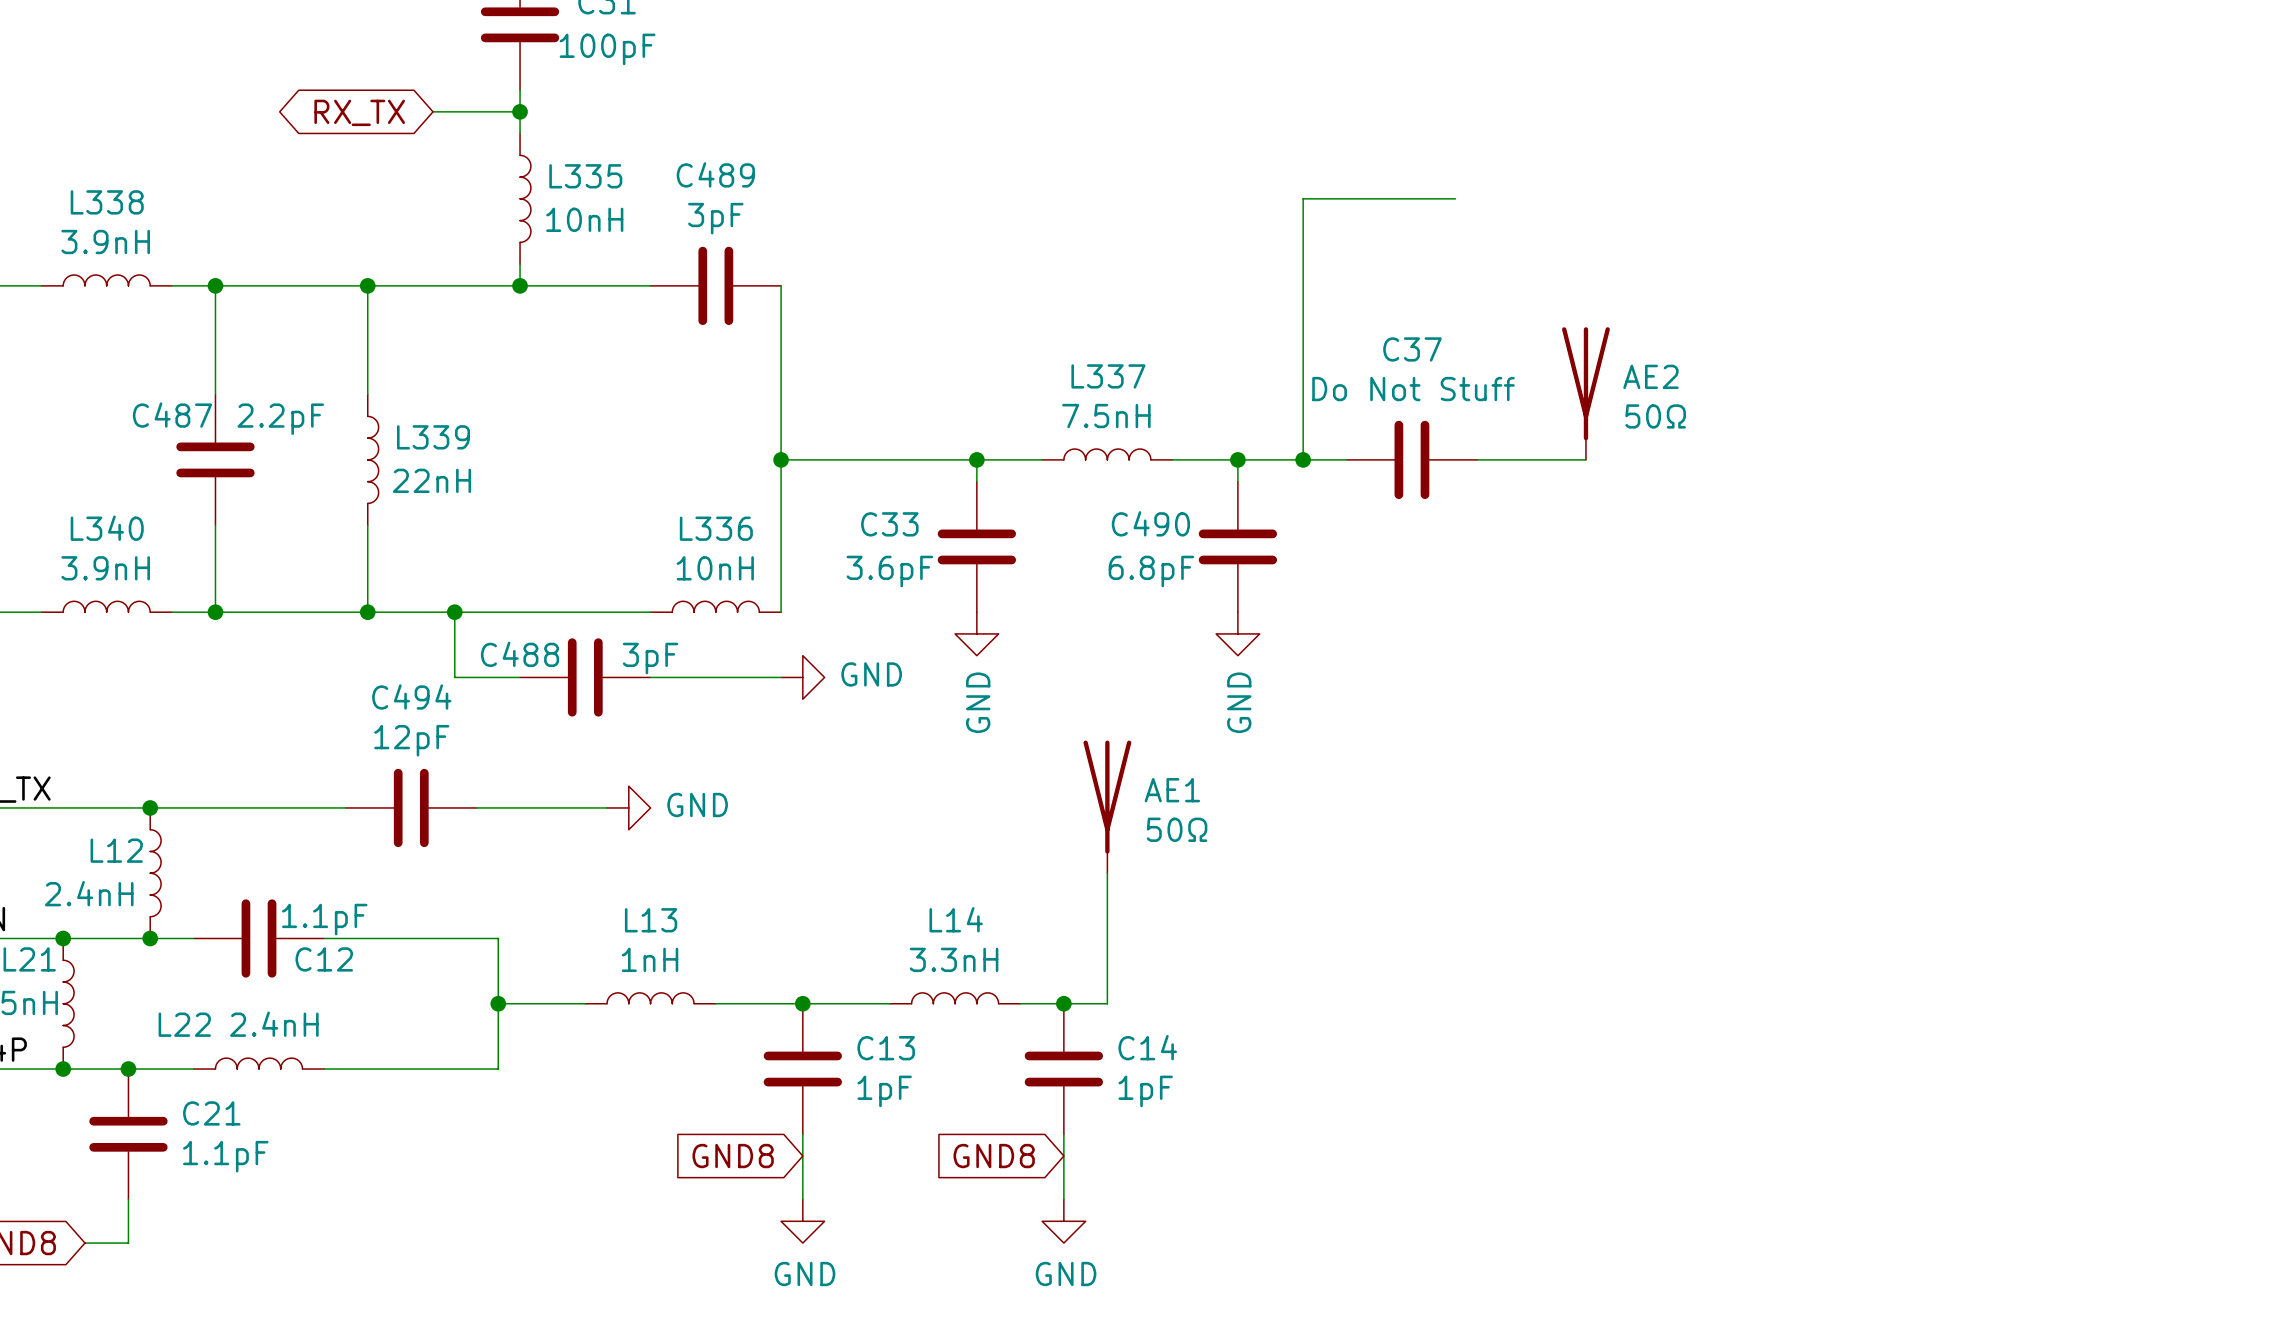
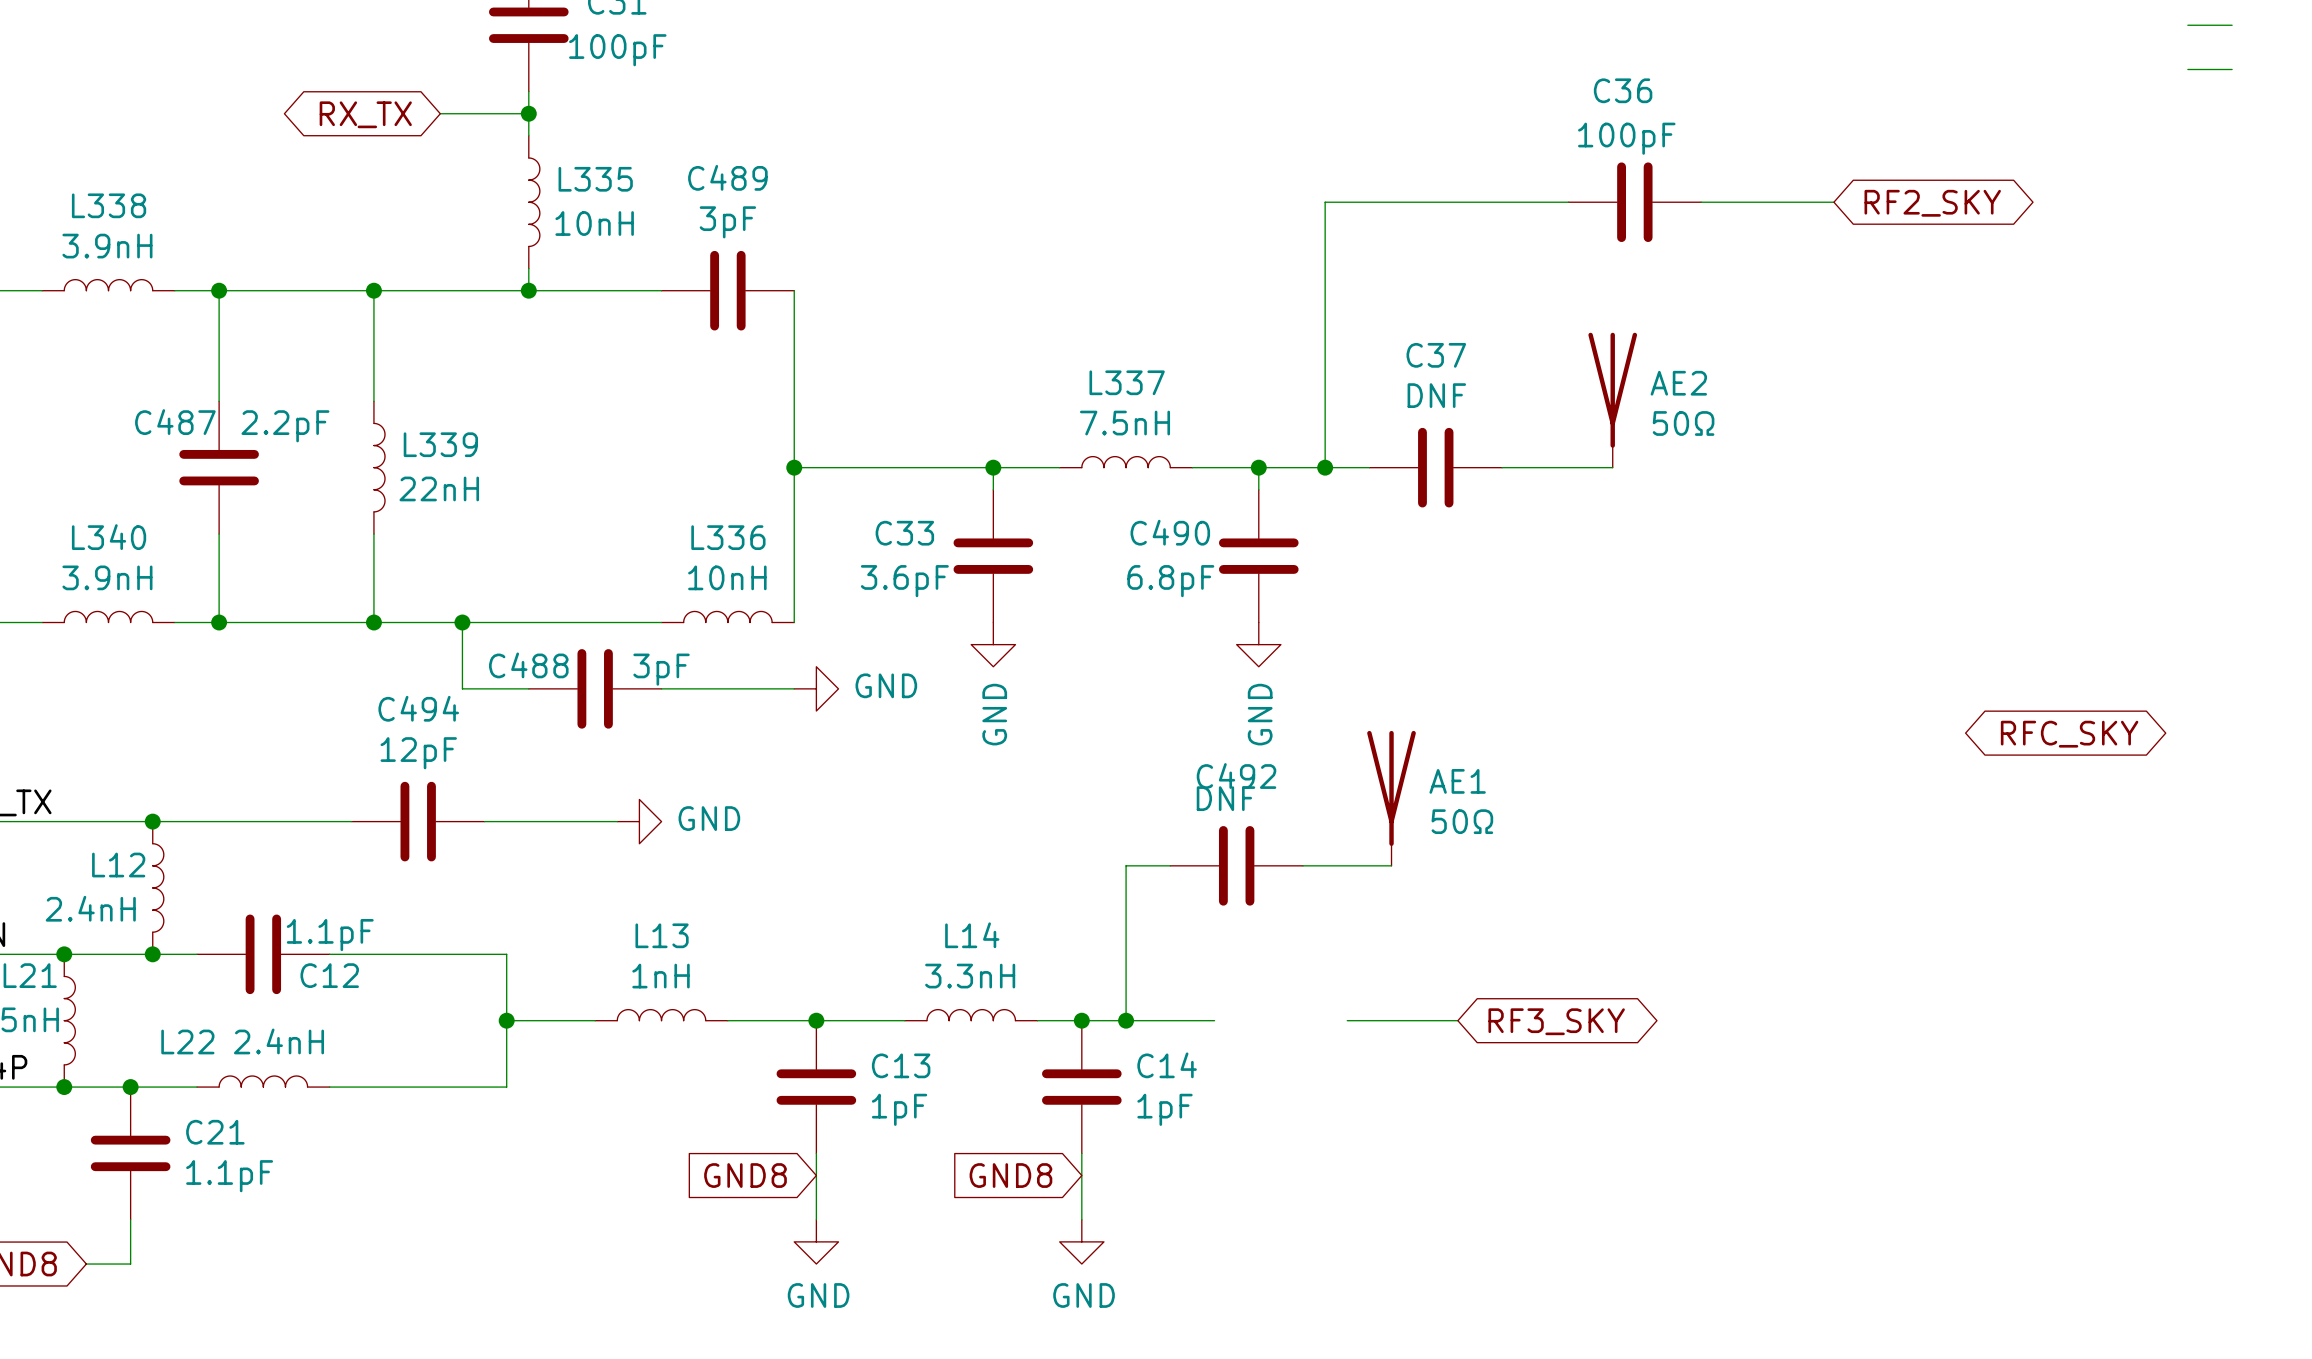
wire: none -> (2187, 25) (2232, 25)
wire: none -> (2187, 69) (2232, 69)
wire: none -> (1479, 202) (1568, 202)
C36: none -> 100pF (1634, 202)
wire: none -> (1701, 202) (1833, 202)
global label: none -> RF2_SKY (1932, 203)
C37 value: Do Not Stuff (1413, 389) -> DNF (1436, 395)
global label: none -> RFC_SKY (2069, 734)
AE1 position: (1107, 806) -> (1391, 798)
wire: none -> (1170, 865) (1126, 865) (1126, 887)
C492: none -> DNF (1236, 865)
wire: none -> (1303, 865) (1391, 865)
wire: none -> (1126, 1020) (1214, 1020)
junction: none -> (1126, 1020)
wire: none -> (1347, 1020) (1457, 1020)
global label: none -> RF3_SKY (1556, 1021)

